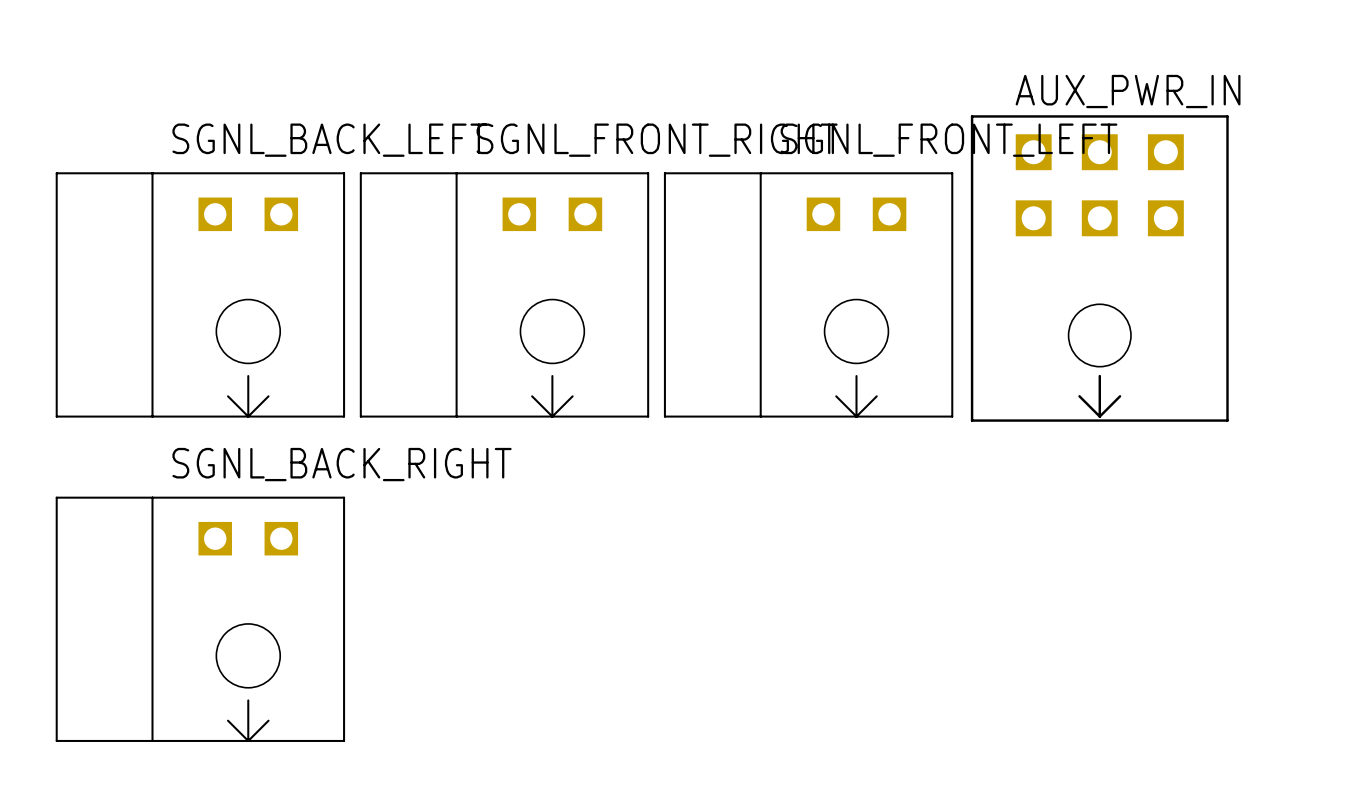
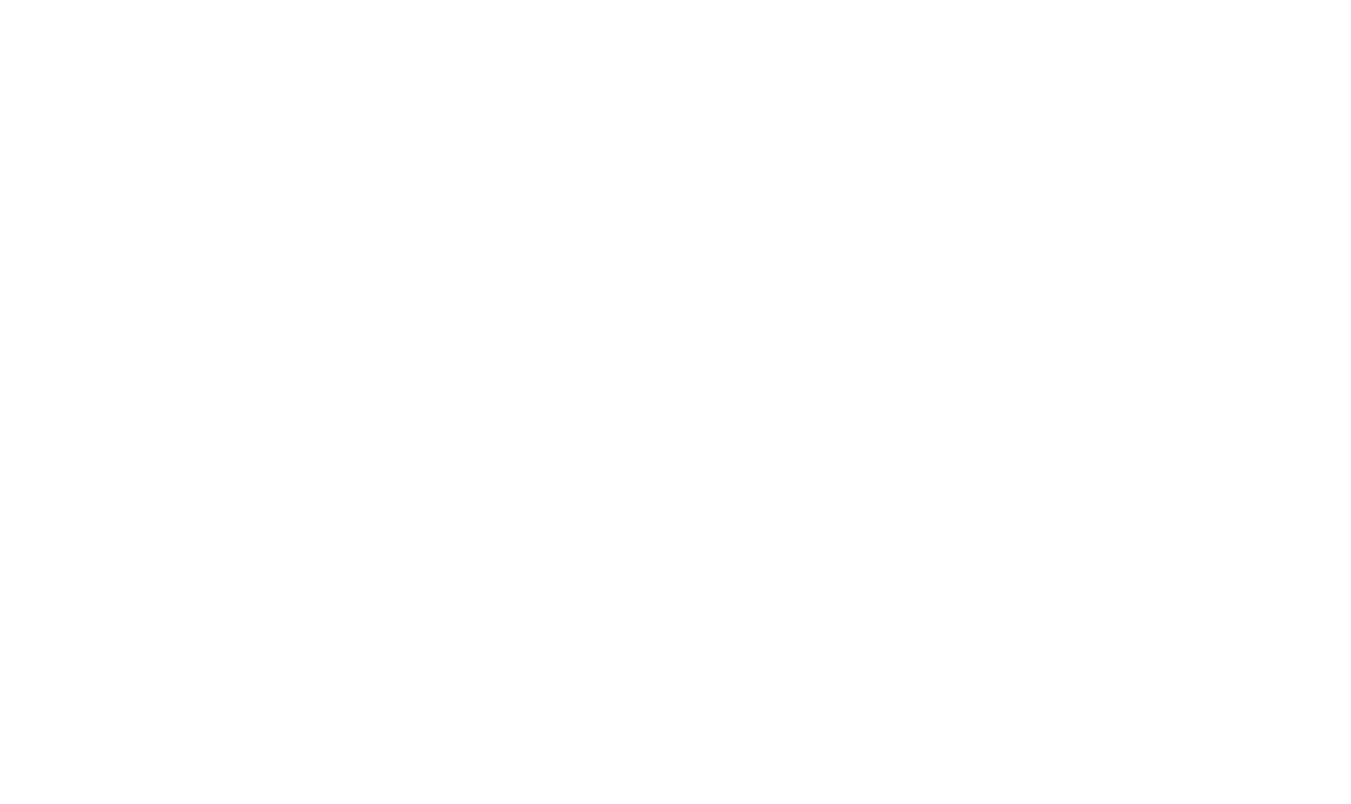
AUX_PWR_IN: (1099, 268) -> none
SGNL_BACK_LEFT: (200, 294) -> none
SGNL_FRONT_RIGHT: (504, 294) -> none
SGNL_FRONT_LEFT: (808, 294) -> none
SGNL_BACK_RIGHT: (200, 619) -> none

